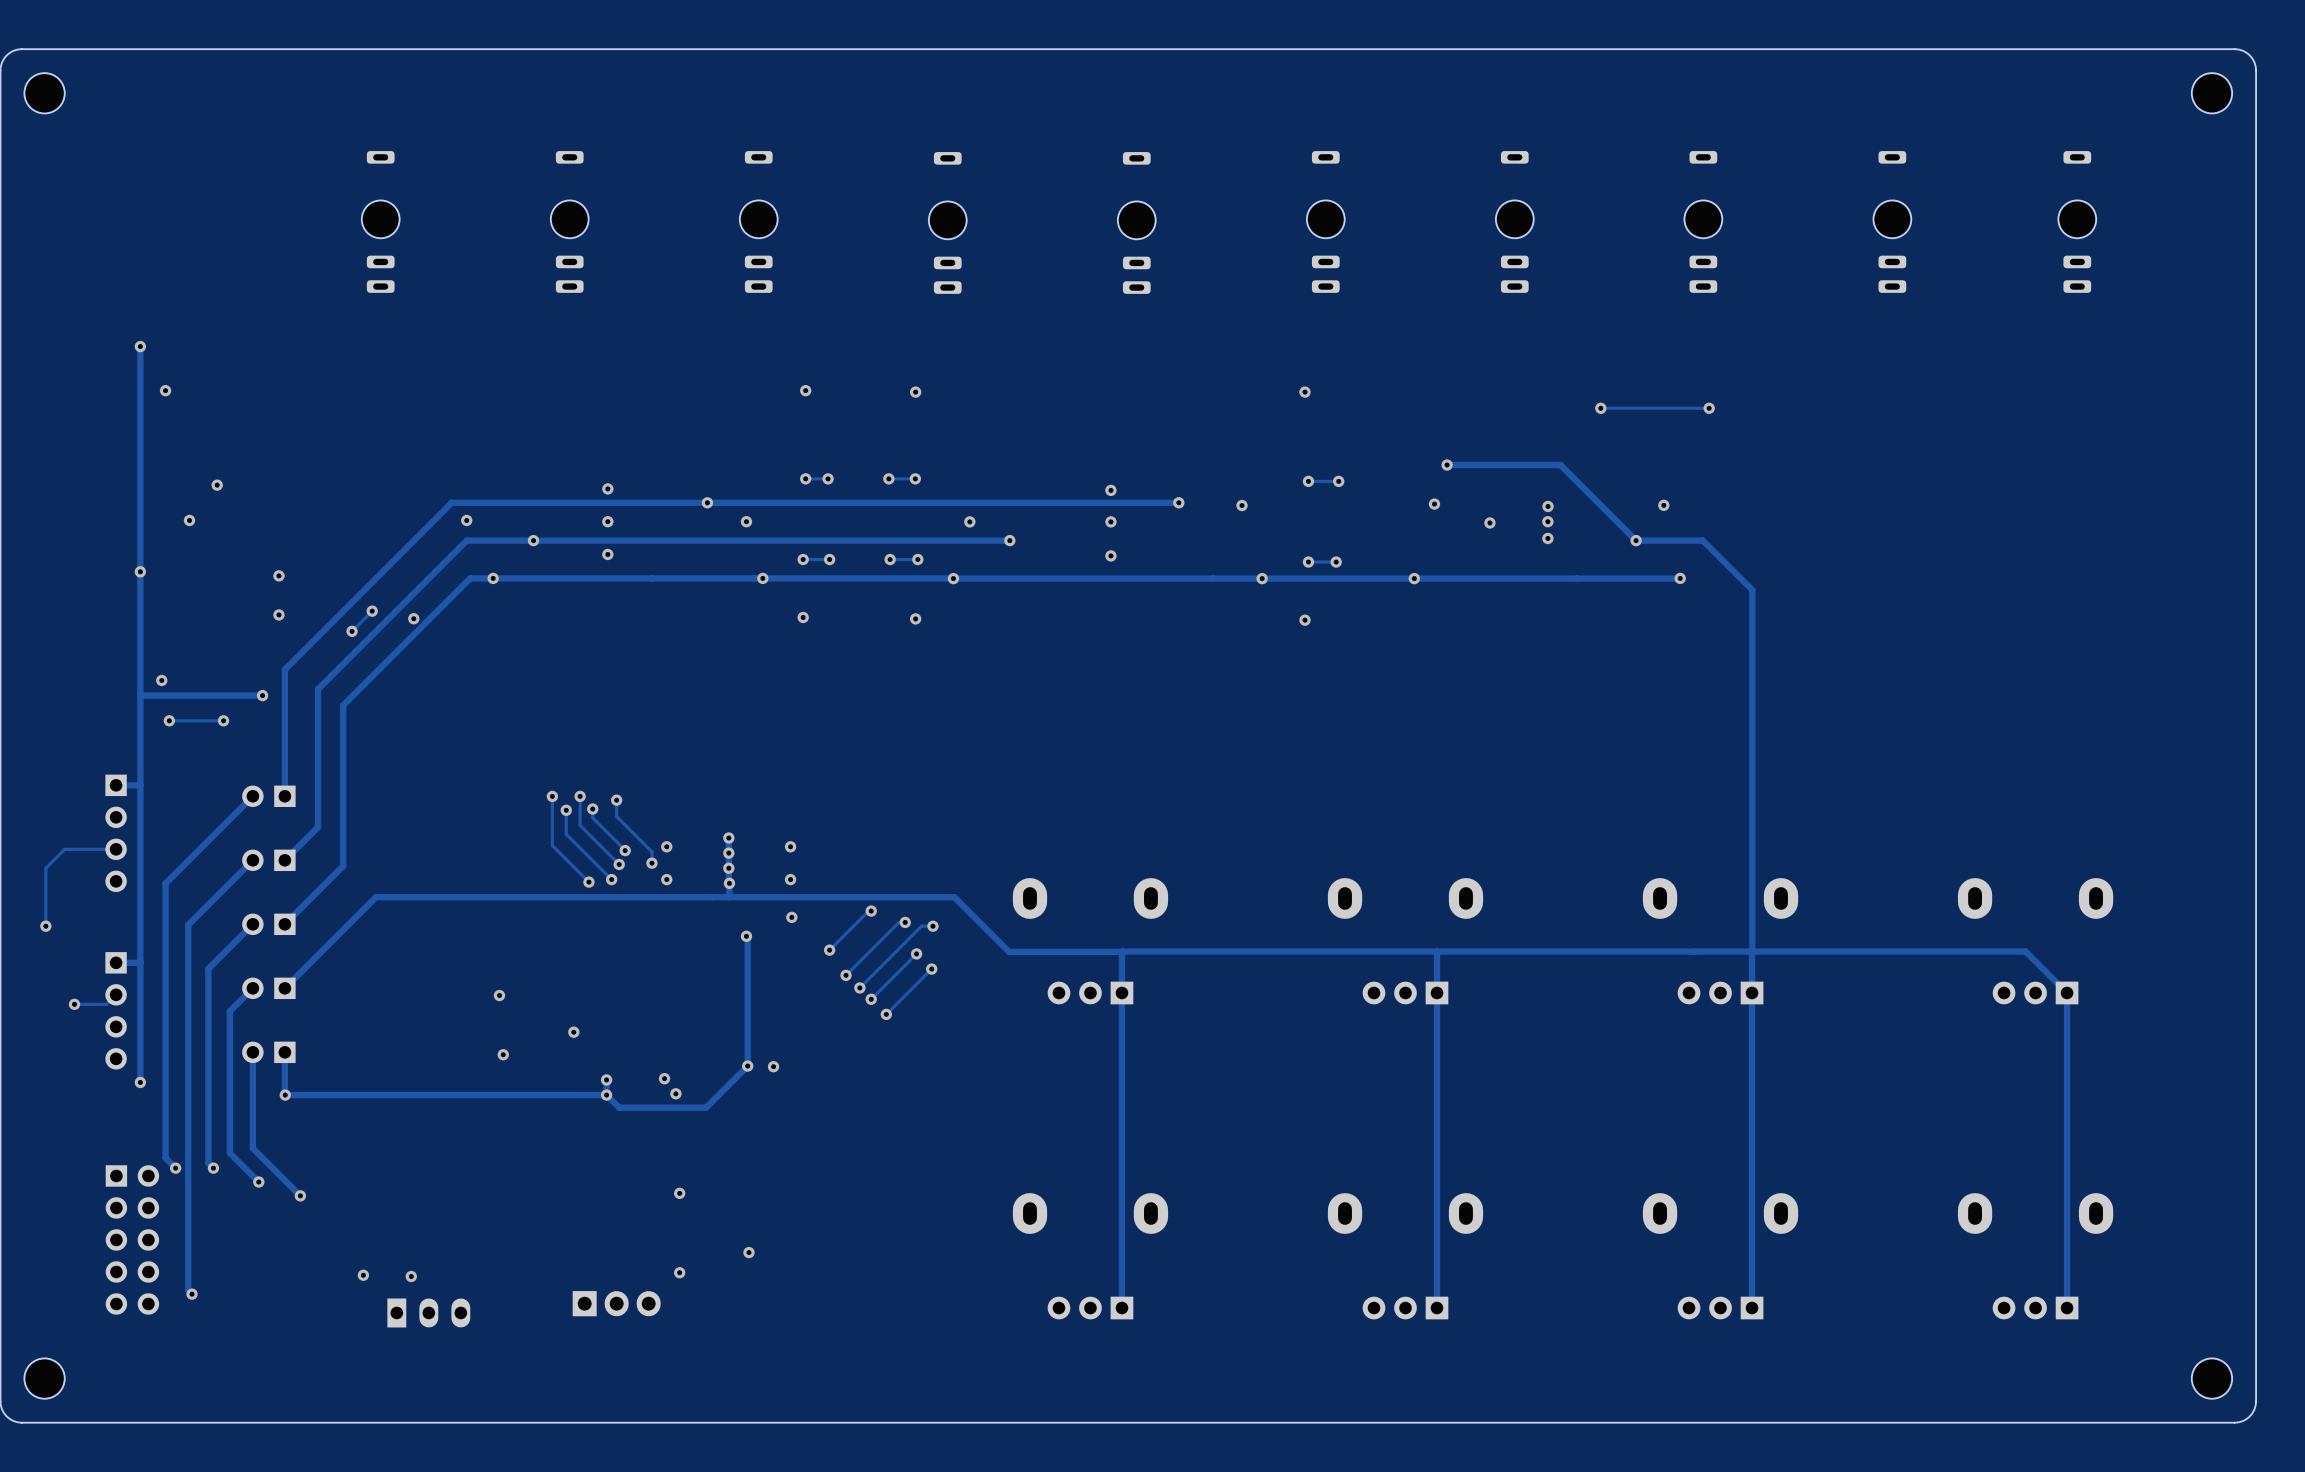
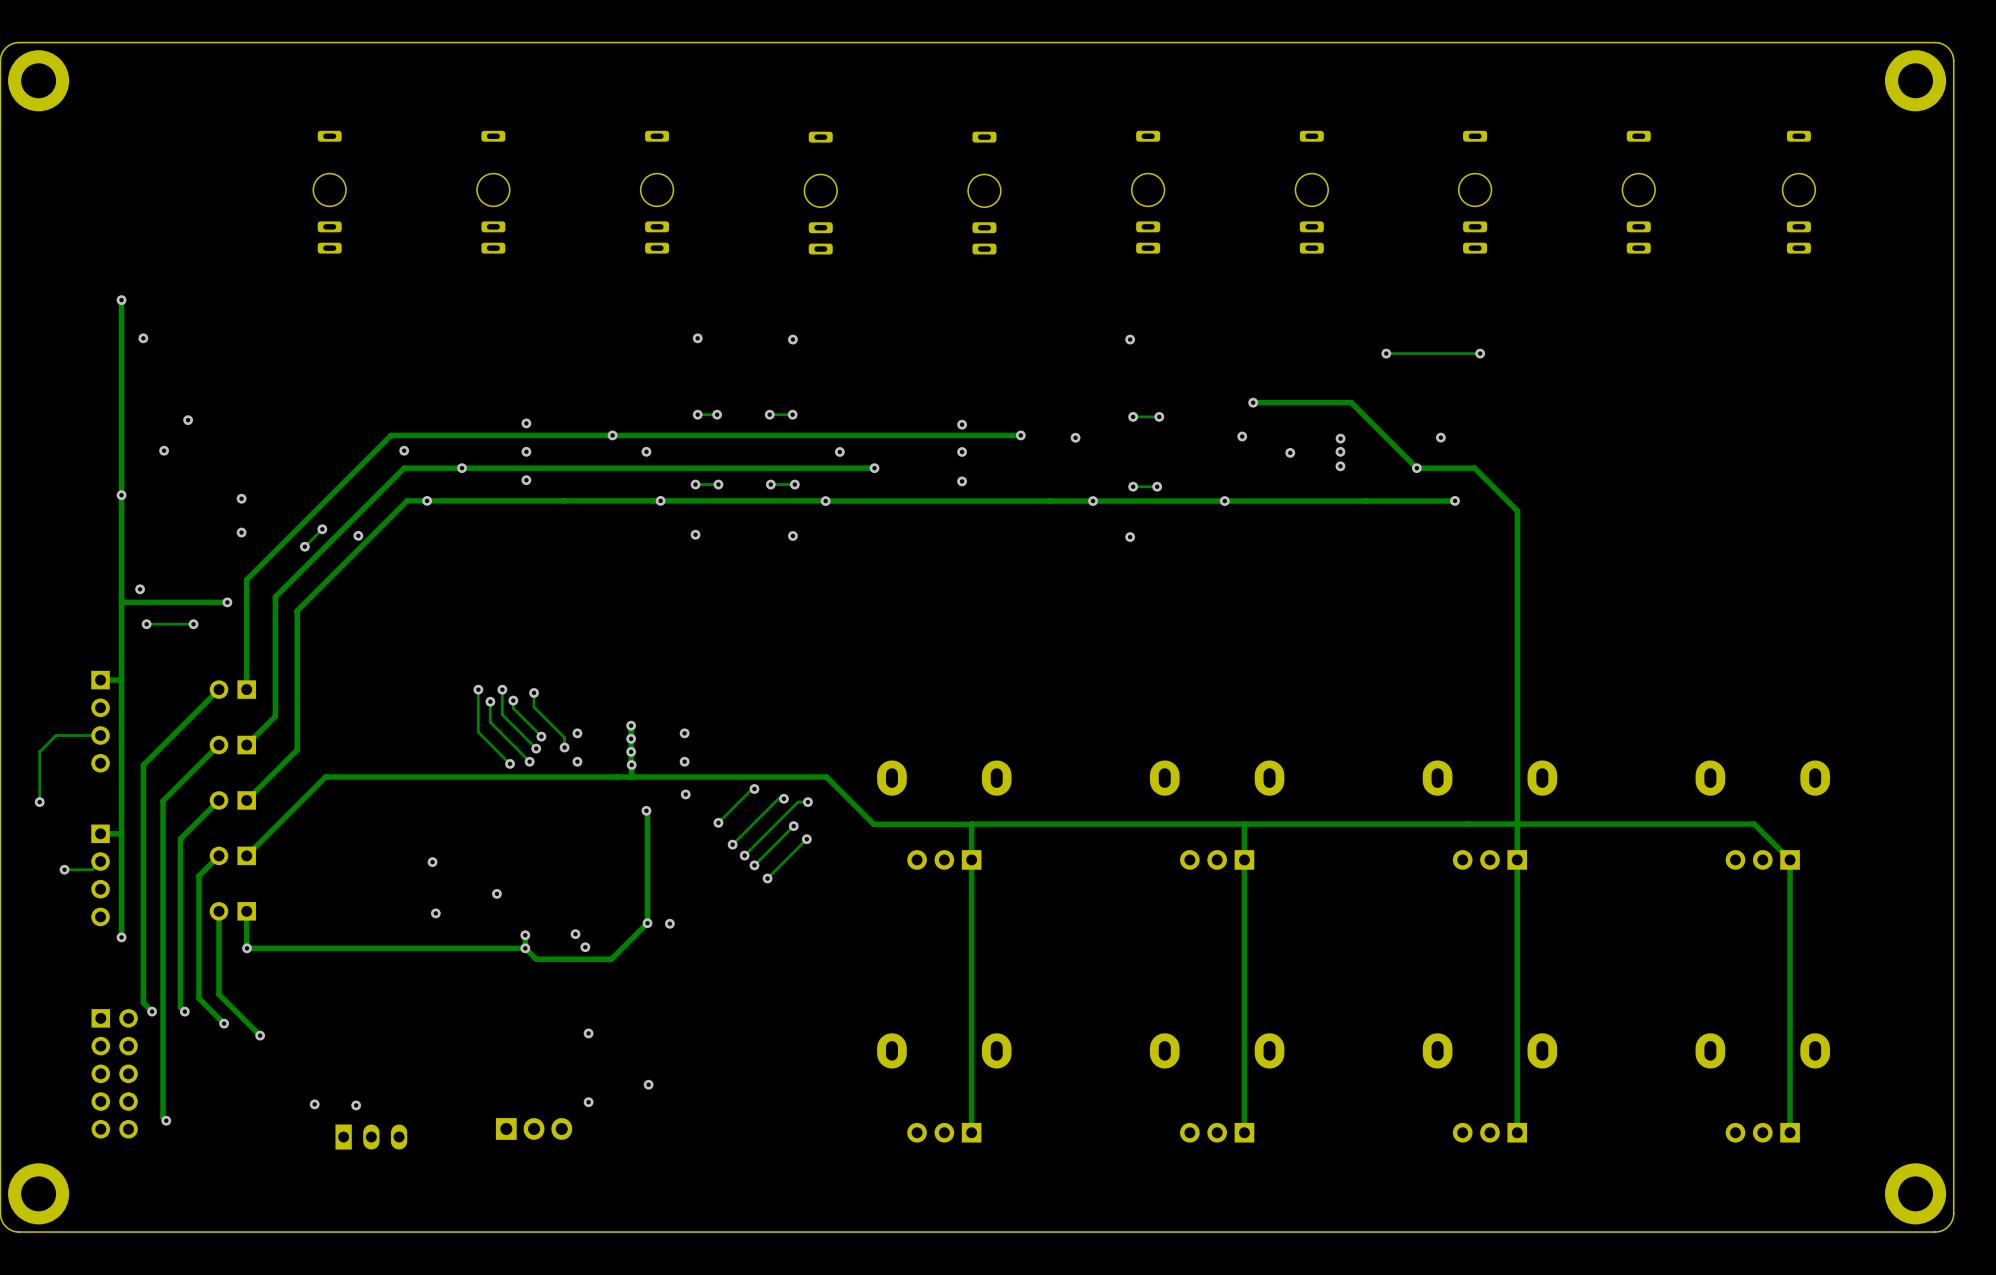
part footprint: [24, 73, 65, 114] -> [8, 50, 70, 112]
part footprint: [2191, 73, 2233, 114] -> [1885, 50, 1947, 112]
part footprint: [24, 1358, 65, 1399] -> [8, 1163, 70, 1225]
part footprint: [2191, 1358, 2233, 1399] -> [1885, 1163, 1947, 1225]

